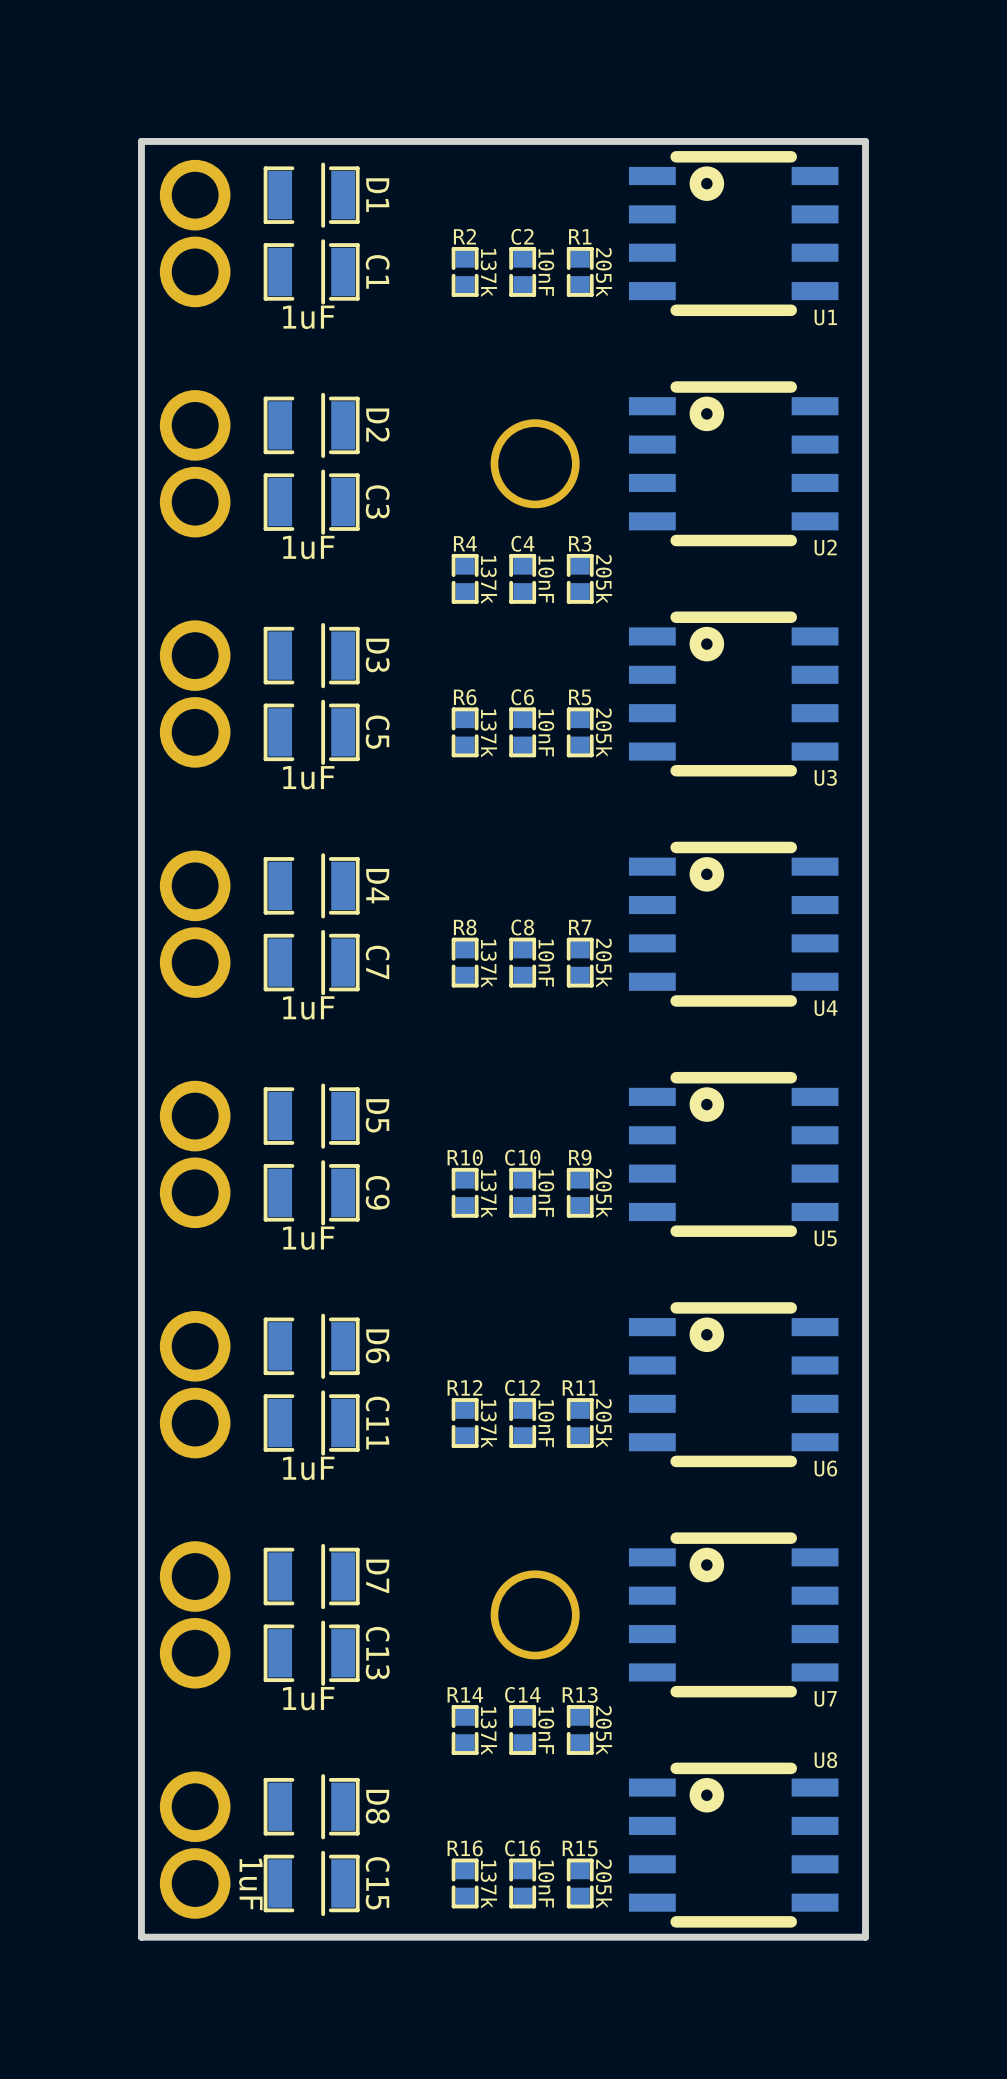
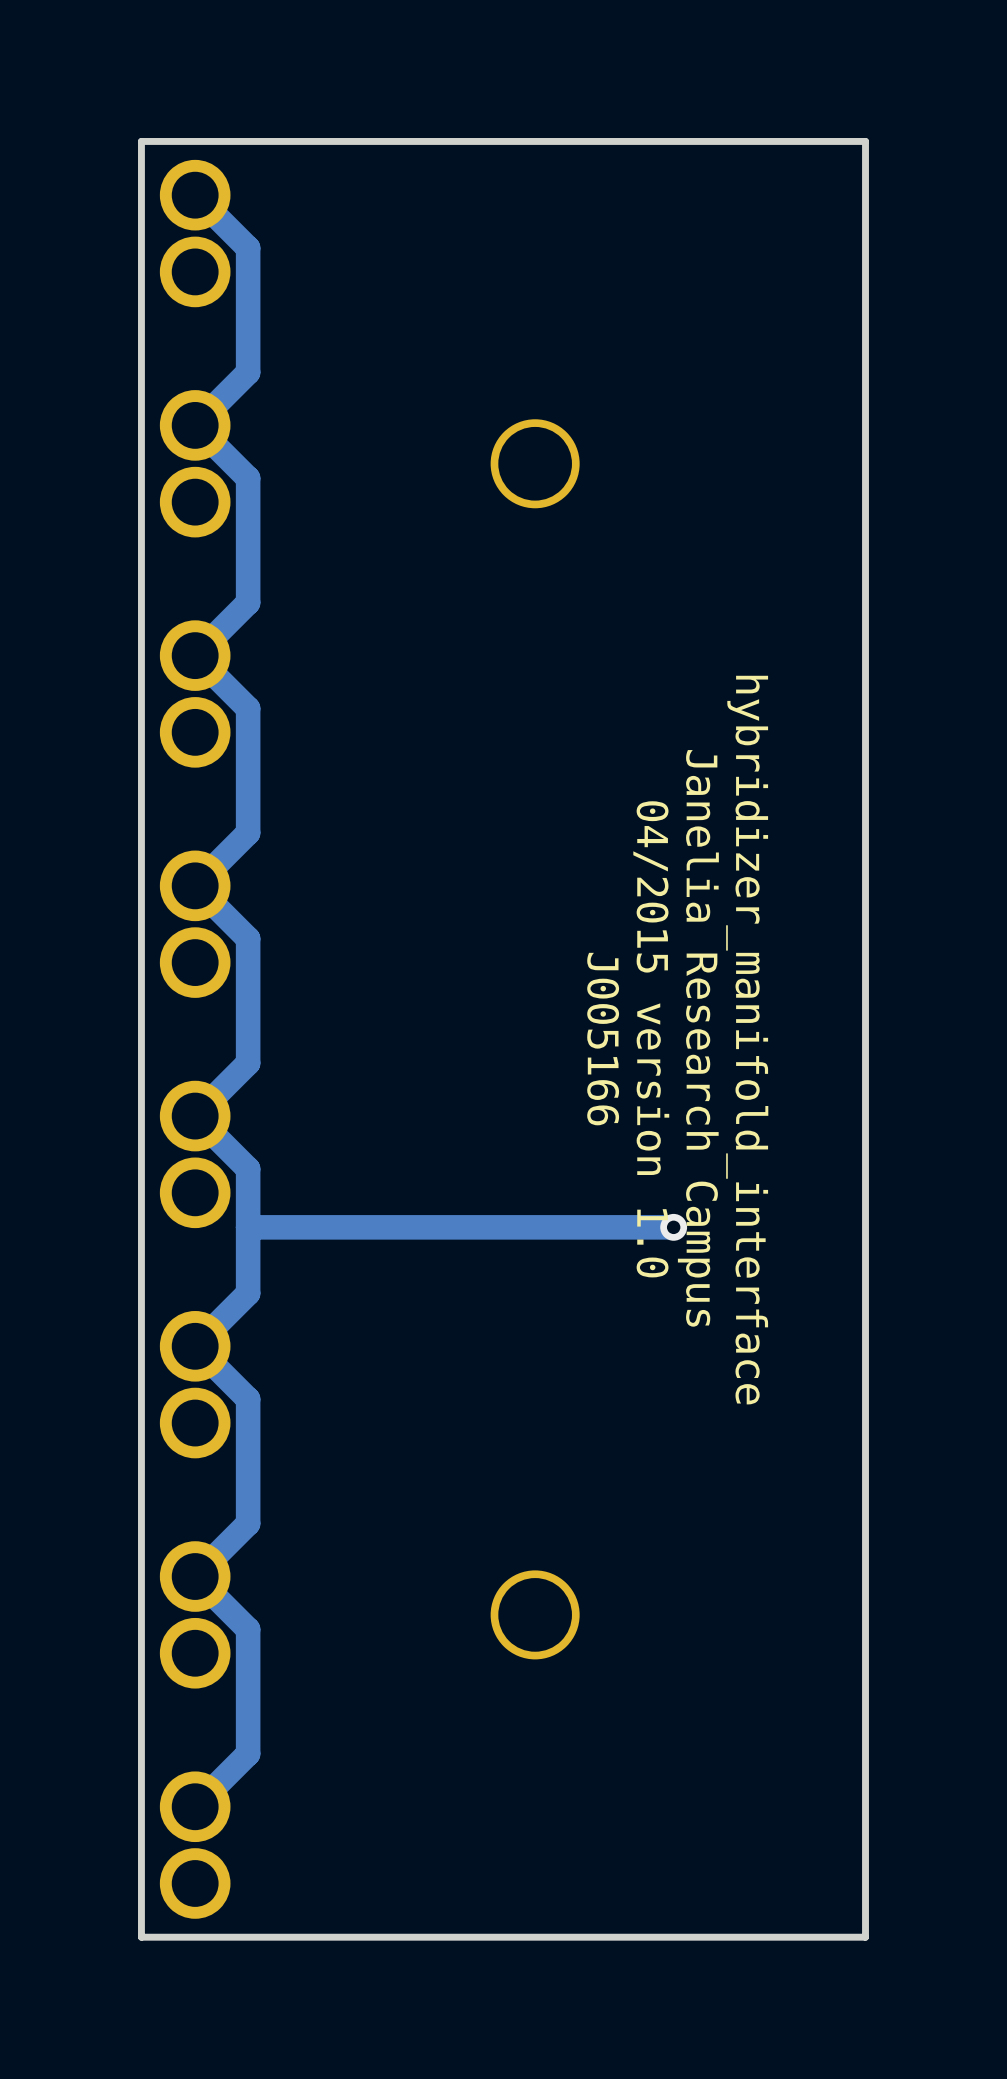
track: none -> (195, 195) (248, 248) (248, 372) (195, 425) (248, 478) (248, 602) (195, 655) (248, 708) (248, 832) (195, 885) (248, 938) (248, 1063) (195, 1116) (248, 1169) (248, 1293) (195, 1346) (248, 1399) (248, 1523) (195, 1576) (248, 1629) (248, 1753) (195, 1806)
D1: (311, 195) -> none
U1: (733, 233) -> none
C1: 1uF (311, 271) -> none
R2: 137k (465, 271) -> none
C2: 10nF (522, 271) -> none
R1: 205k (580, 271) -> none
D2: (311, 425) -> none
U2: (733, 463) -> none
C3: 1uF (311, 502) -> none
R4: 137k (465, 578) -> none
C4: 10nF (522, 578) -> none
R3: 205k (580, 578) -> none
D3: (311, 655) -> none
U3: (733, 693) -> none
C5: 1uF (311, 732) -> none
R6: 137k (465, 732) -> none
C6: 10nF (522, 732) -> none
R5: 205k (580, 732) -> none
D4: (311, 885) -> none
U4: (733, 924) -> none
C7: 1uF (311, 962) -> none
R8: 137k (465, 962) -> none
C8: 10nF (522, 962) -> none
R7: 205k (580, 962) -> none
text: none -> Janelia Research Campus (698, 1038)
text: none -> J005166 (603, 1039)
text: none -> 04/2015 version 1.0 (651, 1039)
text: none -> hybridizer_manifold_interface (747, 1040)
D5: (311, 1116) -> none
U5: (733, 1154) -> none
C9: 1uF (311, 1192) -> none
R10: 137k (465, 1192) -> none
C10: 10nF (522, 1192) -> none
R9: 205k (580, 1192) -> none
track: none -> (673, 1227) (248, 1227)
via: none -> (673, 1227)
D6: (311, 1346) -> none
U6: (733, 1384) -> none
C11: 1uF (311, 1423) -> none
R12: 137k (465, 1423) -> none
C12: 10nF (522, 1423) -> none
R11: 205k (580, 1423) -> none
D7: (311, 1576) -> none
U7: (733, 1614) -> none
C13: 1uF (311, 1653) -> none
R14: 137k (465, 1730) -> none
C14: 10nF (522, 1730) -> none
R13: 205k (580, 1730) -> none
D8: (311, 1806) -> none
U8: (733, 1845) -> none
C15: 1uF (311, 1883) -> none
R16: 137k (465, 1883) -> none
C16: 10nF (522, 1883) -> none
R15: 205k (580, 1883) -> none

